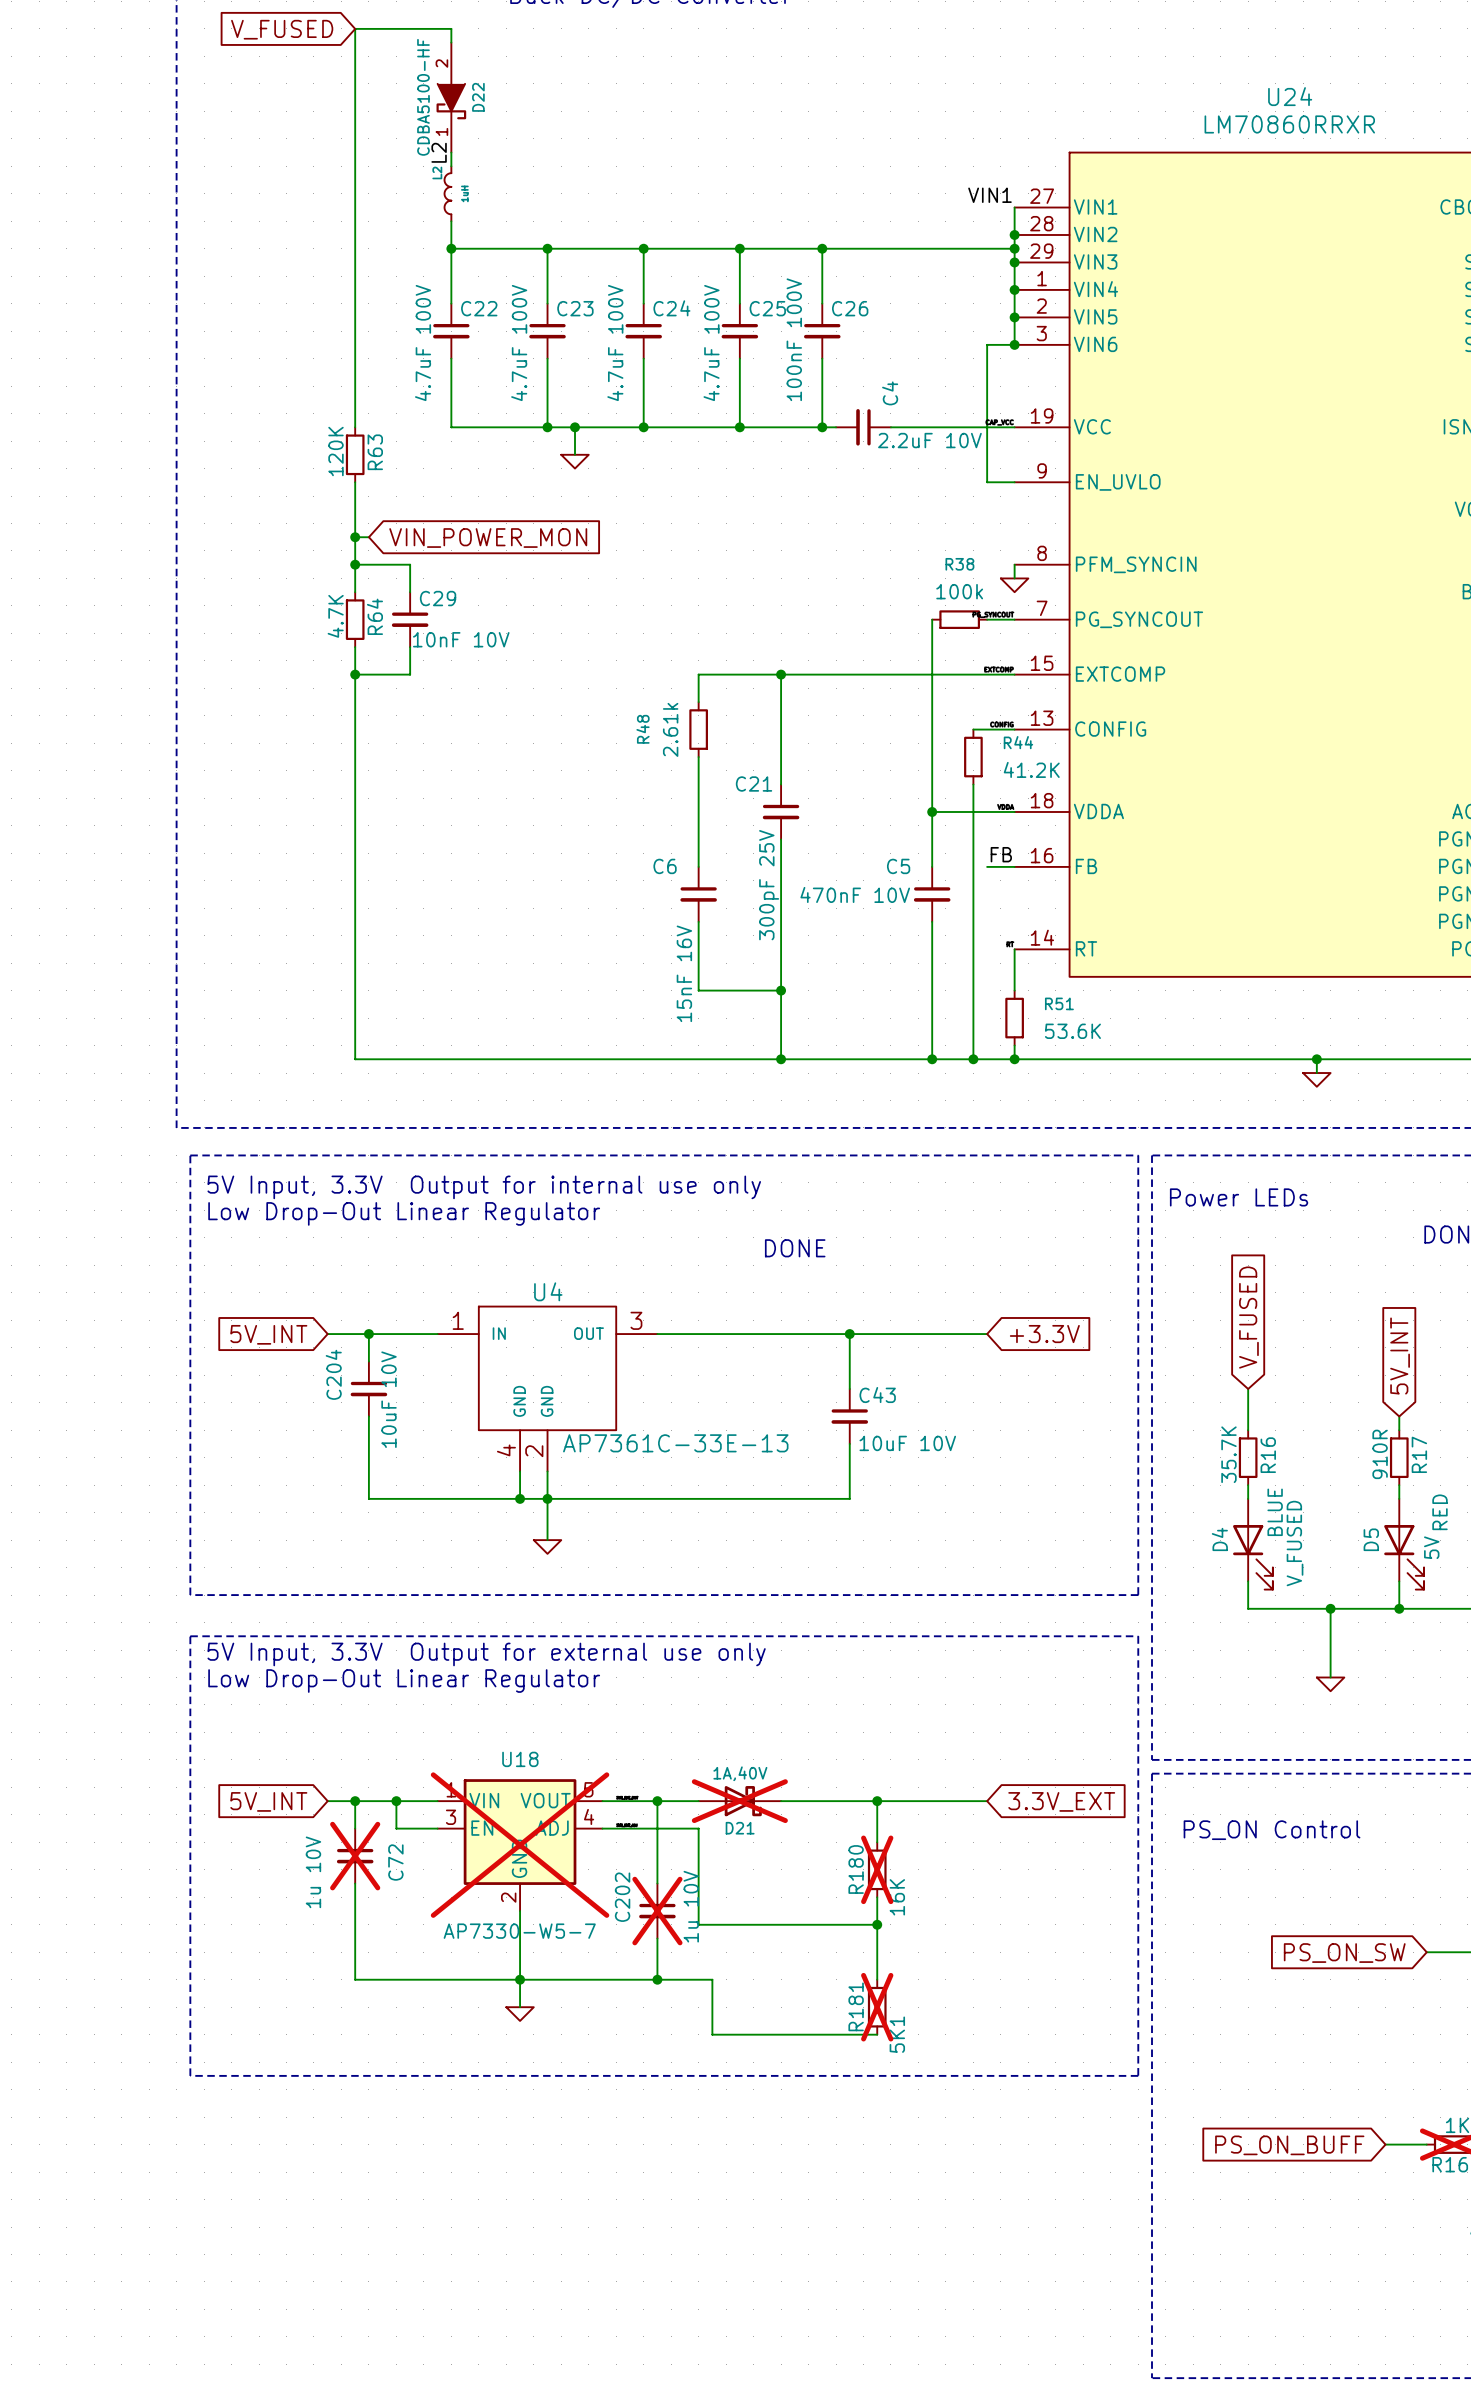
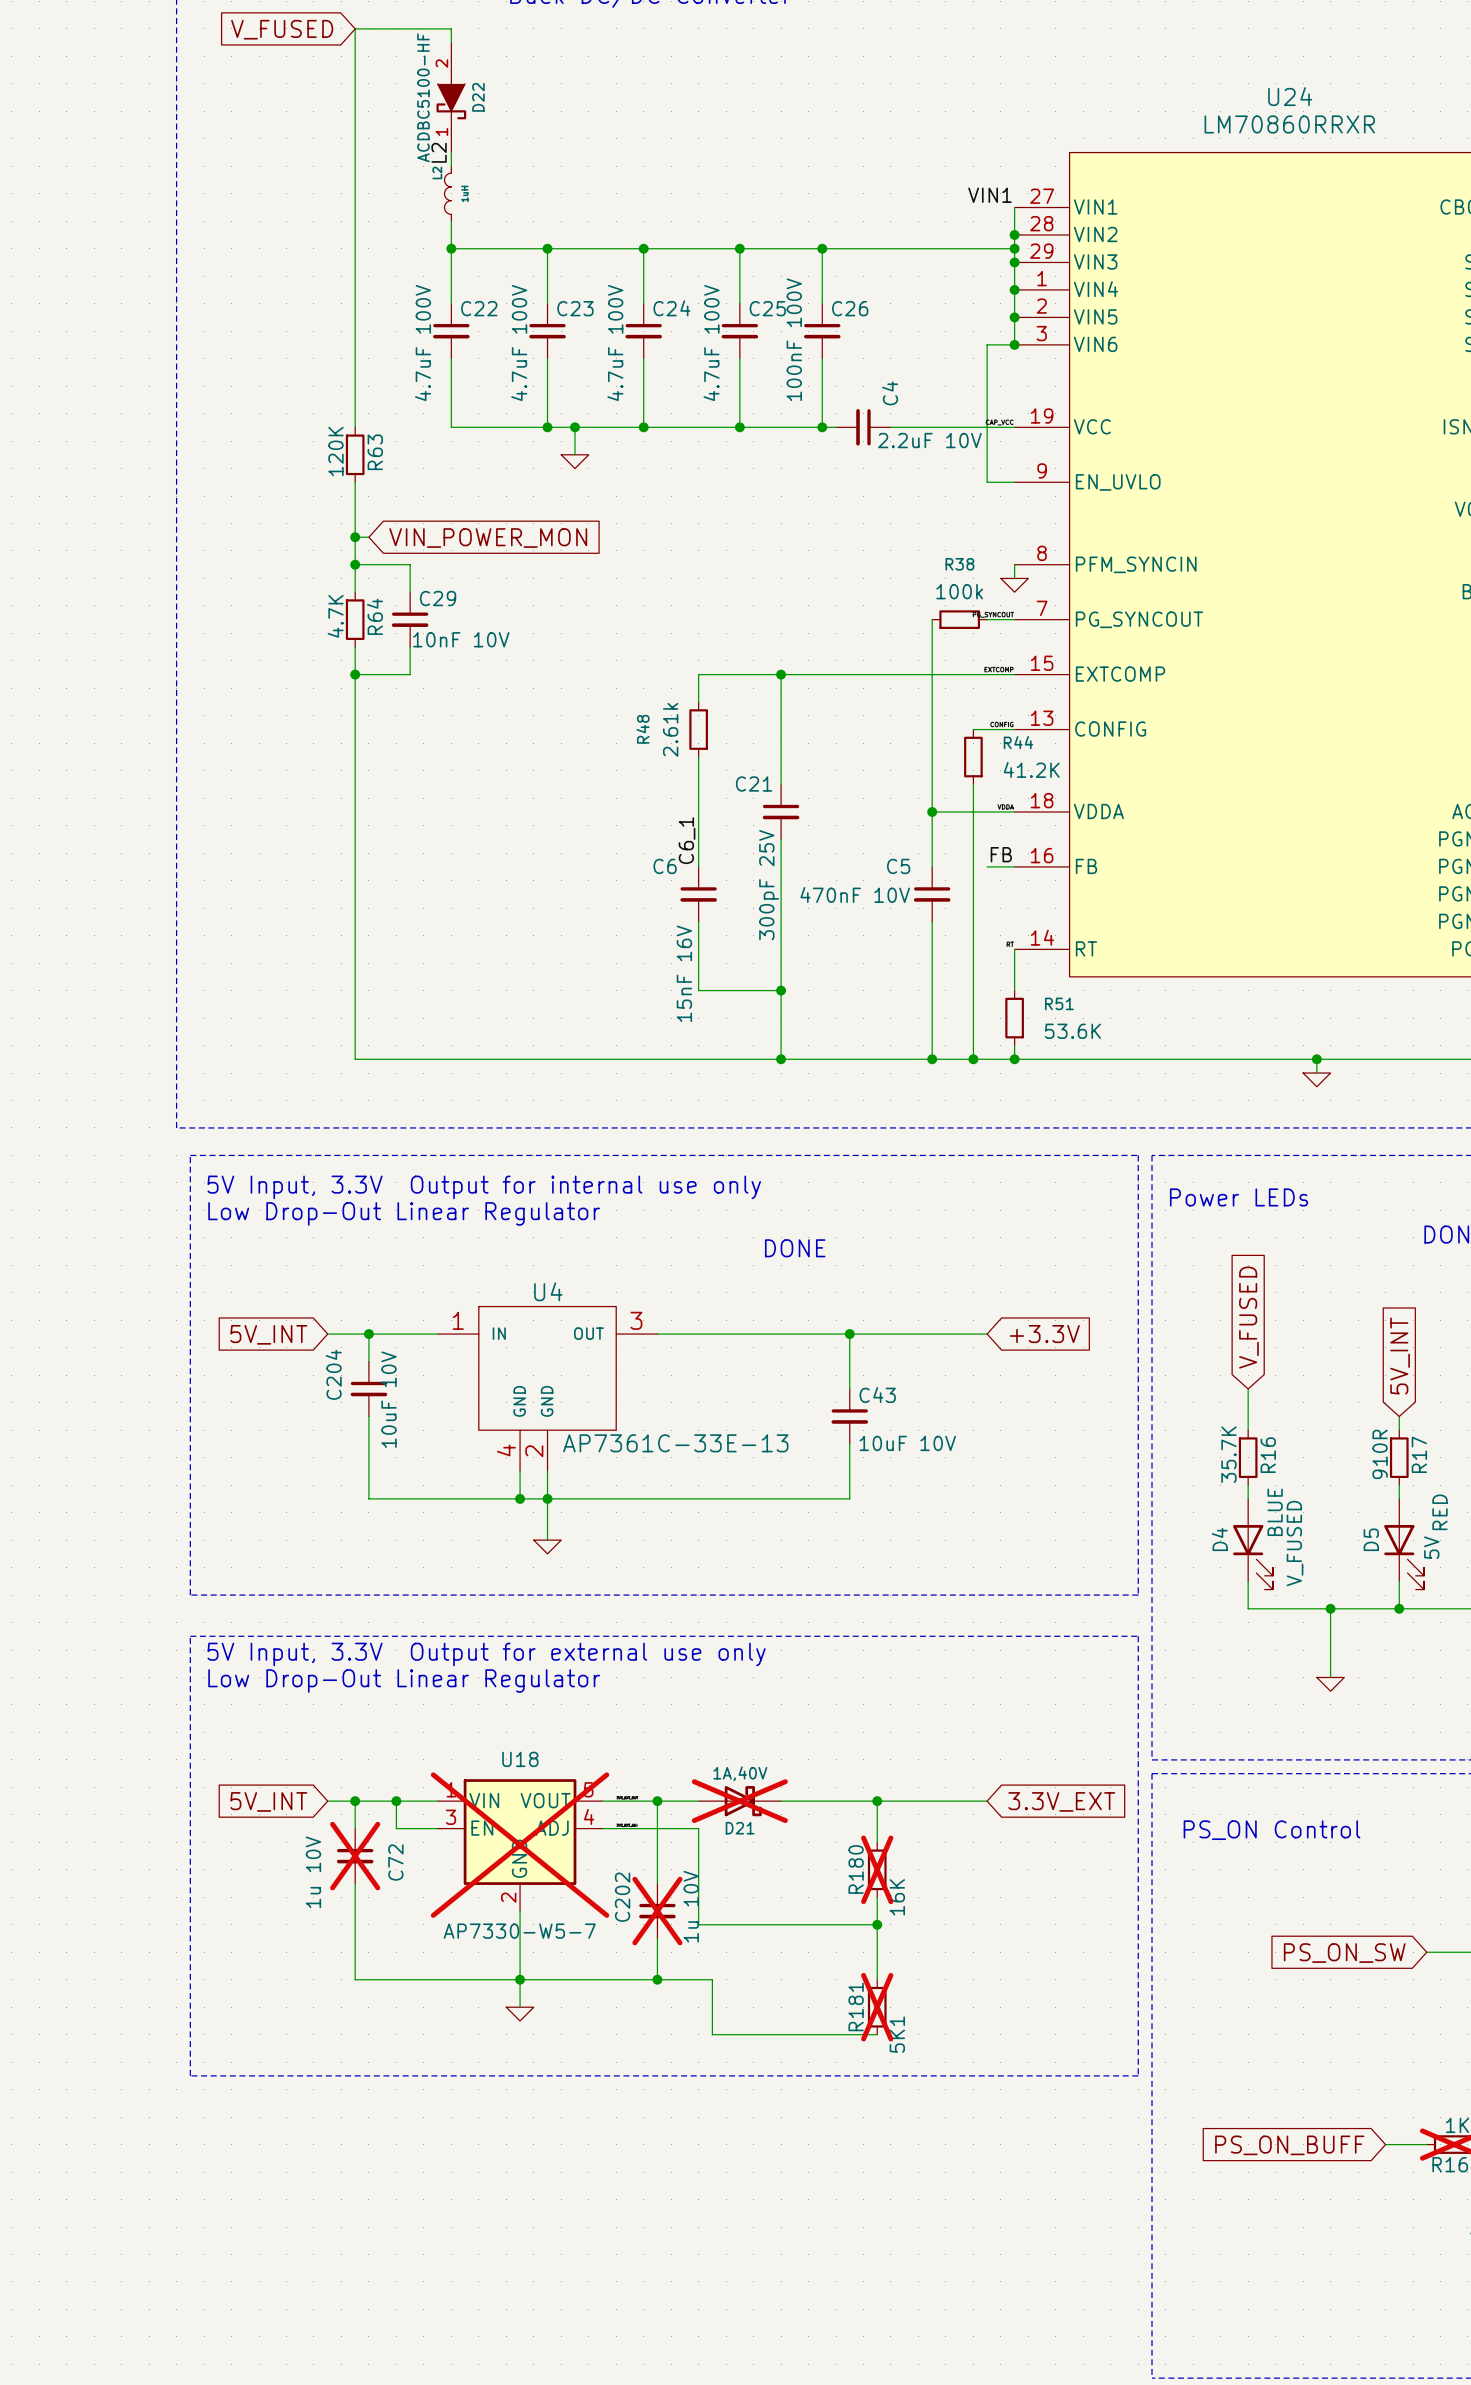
D22 value: CDBA5100-HF (423, 97) -> ACDBC5100-HF (423, 97)
label: none -> C6_1 (687, 840)

